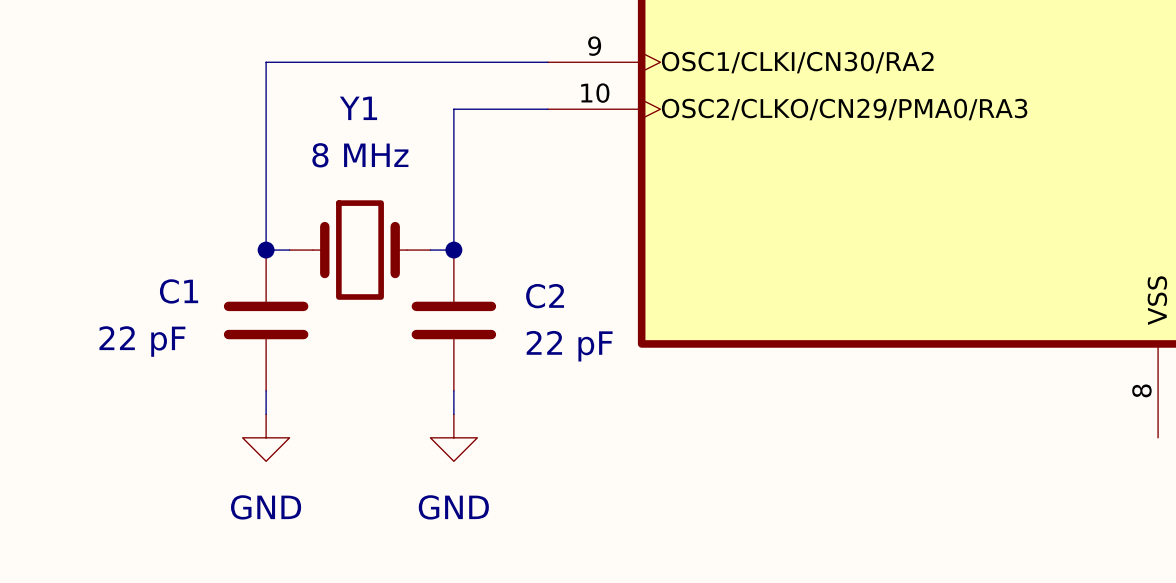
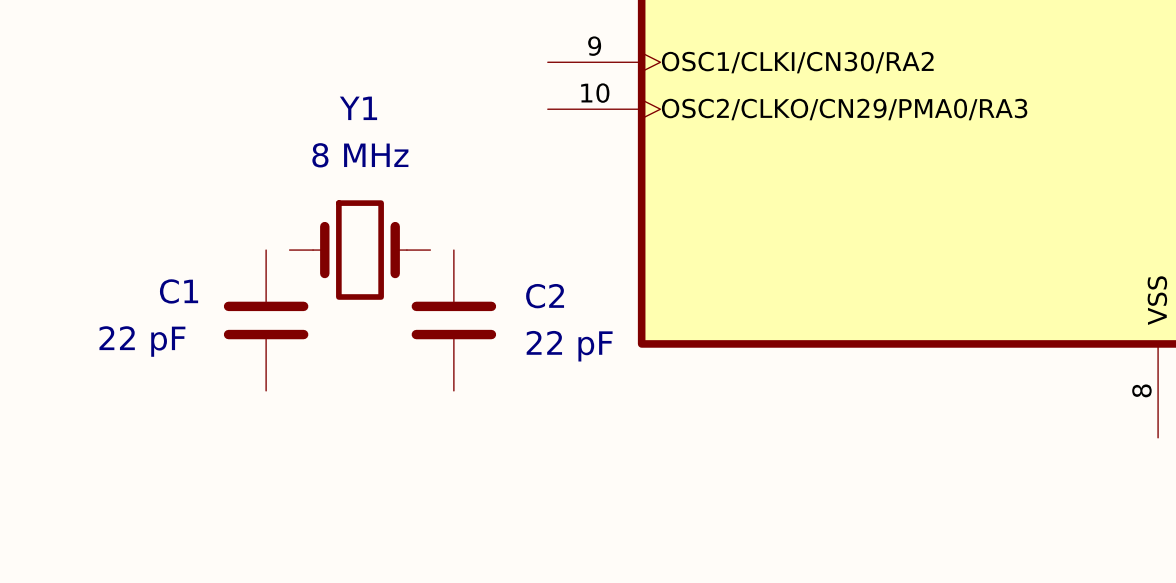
wire: (547, 62) (266, 62) (266, 250) (289, 250) -> none
wire: (547, 109) (453, 109) (453, 250) (430, 250) -> none
junction: (266, 250) -> none
junction: (453, 250) -> none
wire: (266, 390) (266, 414) -> none
wire: (453, 390) (453, 414) -> none
power symbol: GND (266, 437) -> none
power symbol: GND (453, 437) -> none

